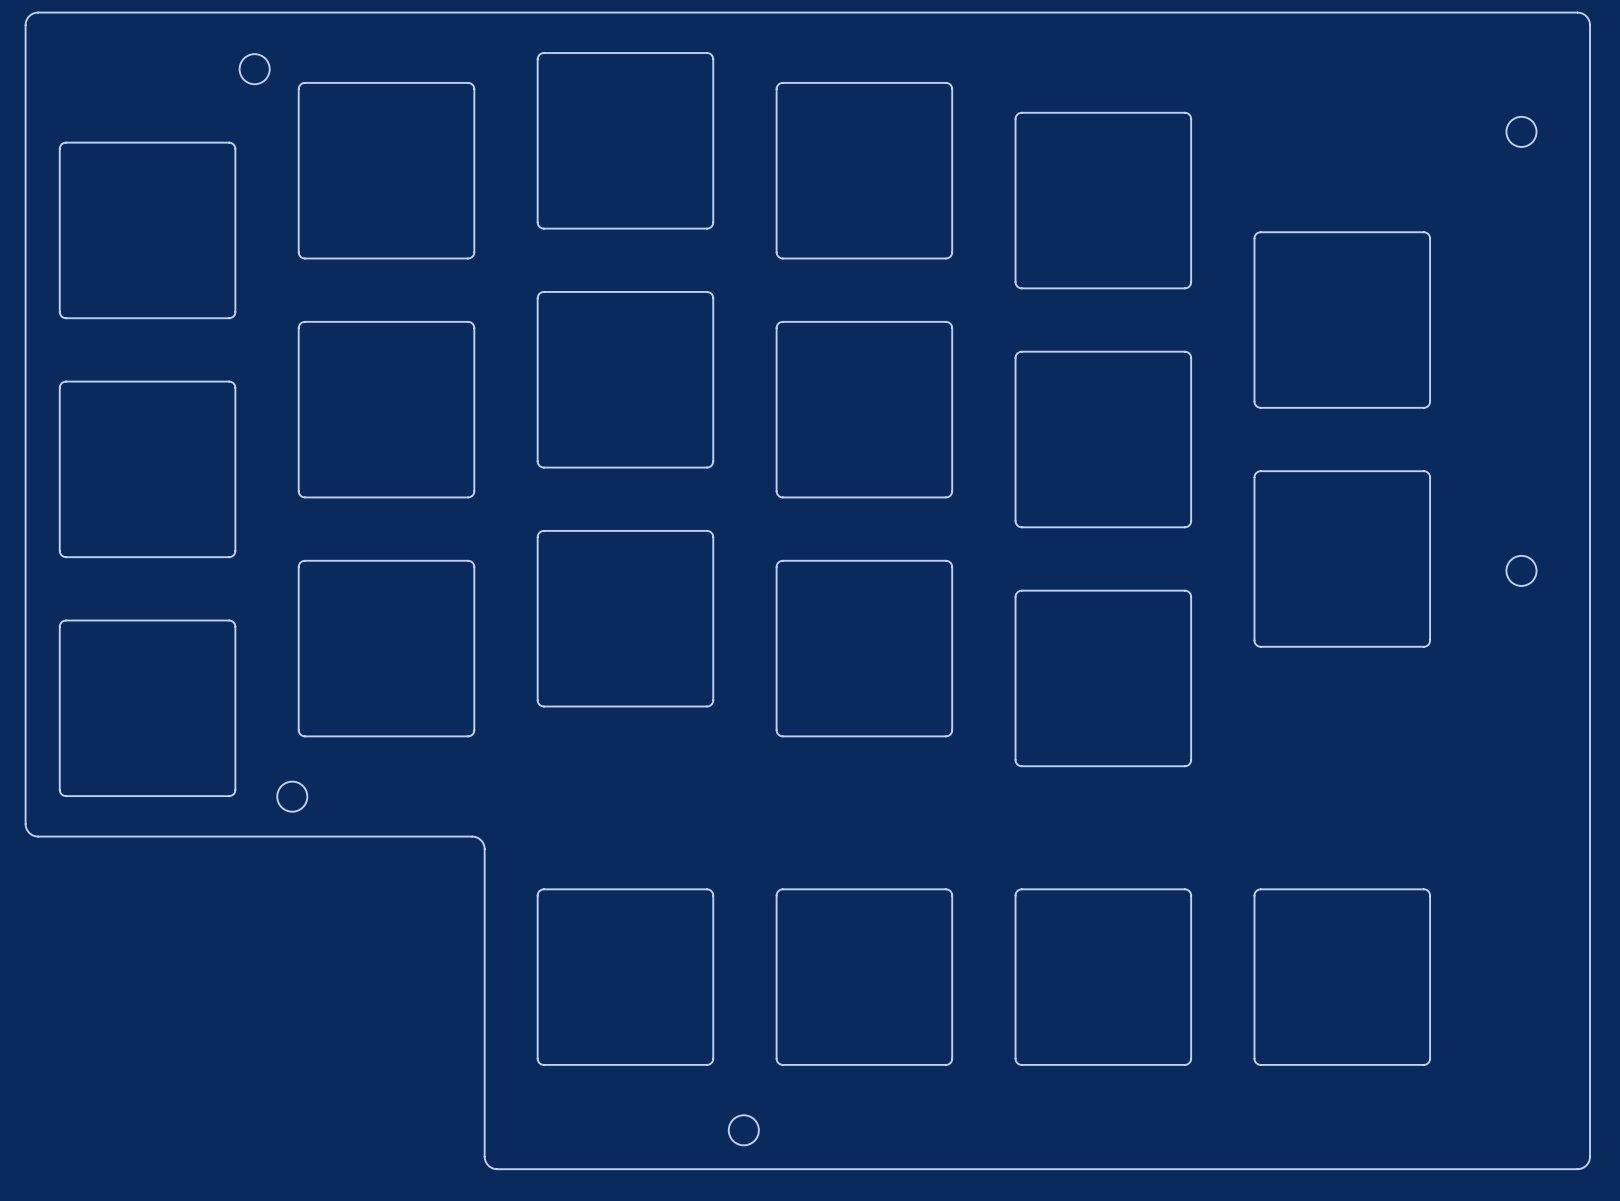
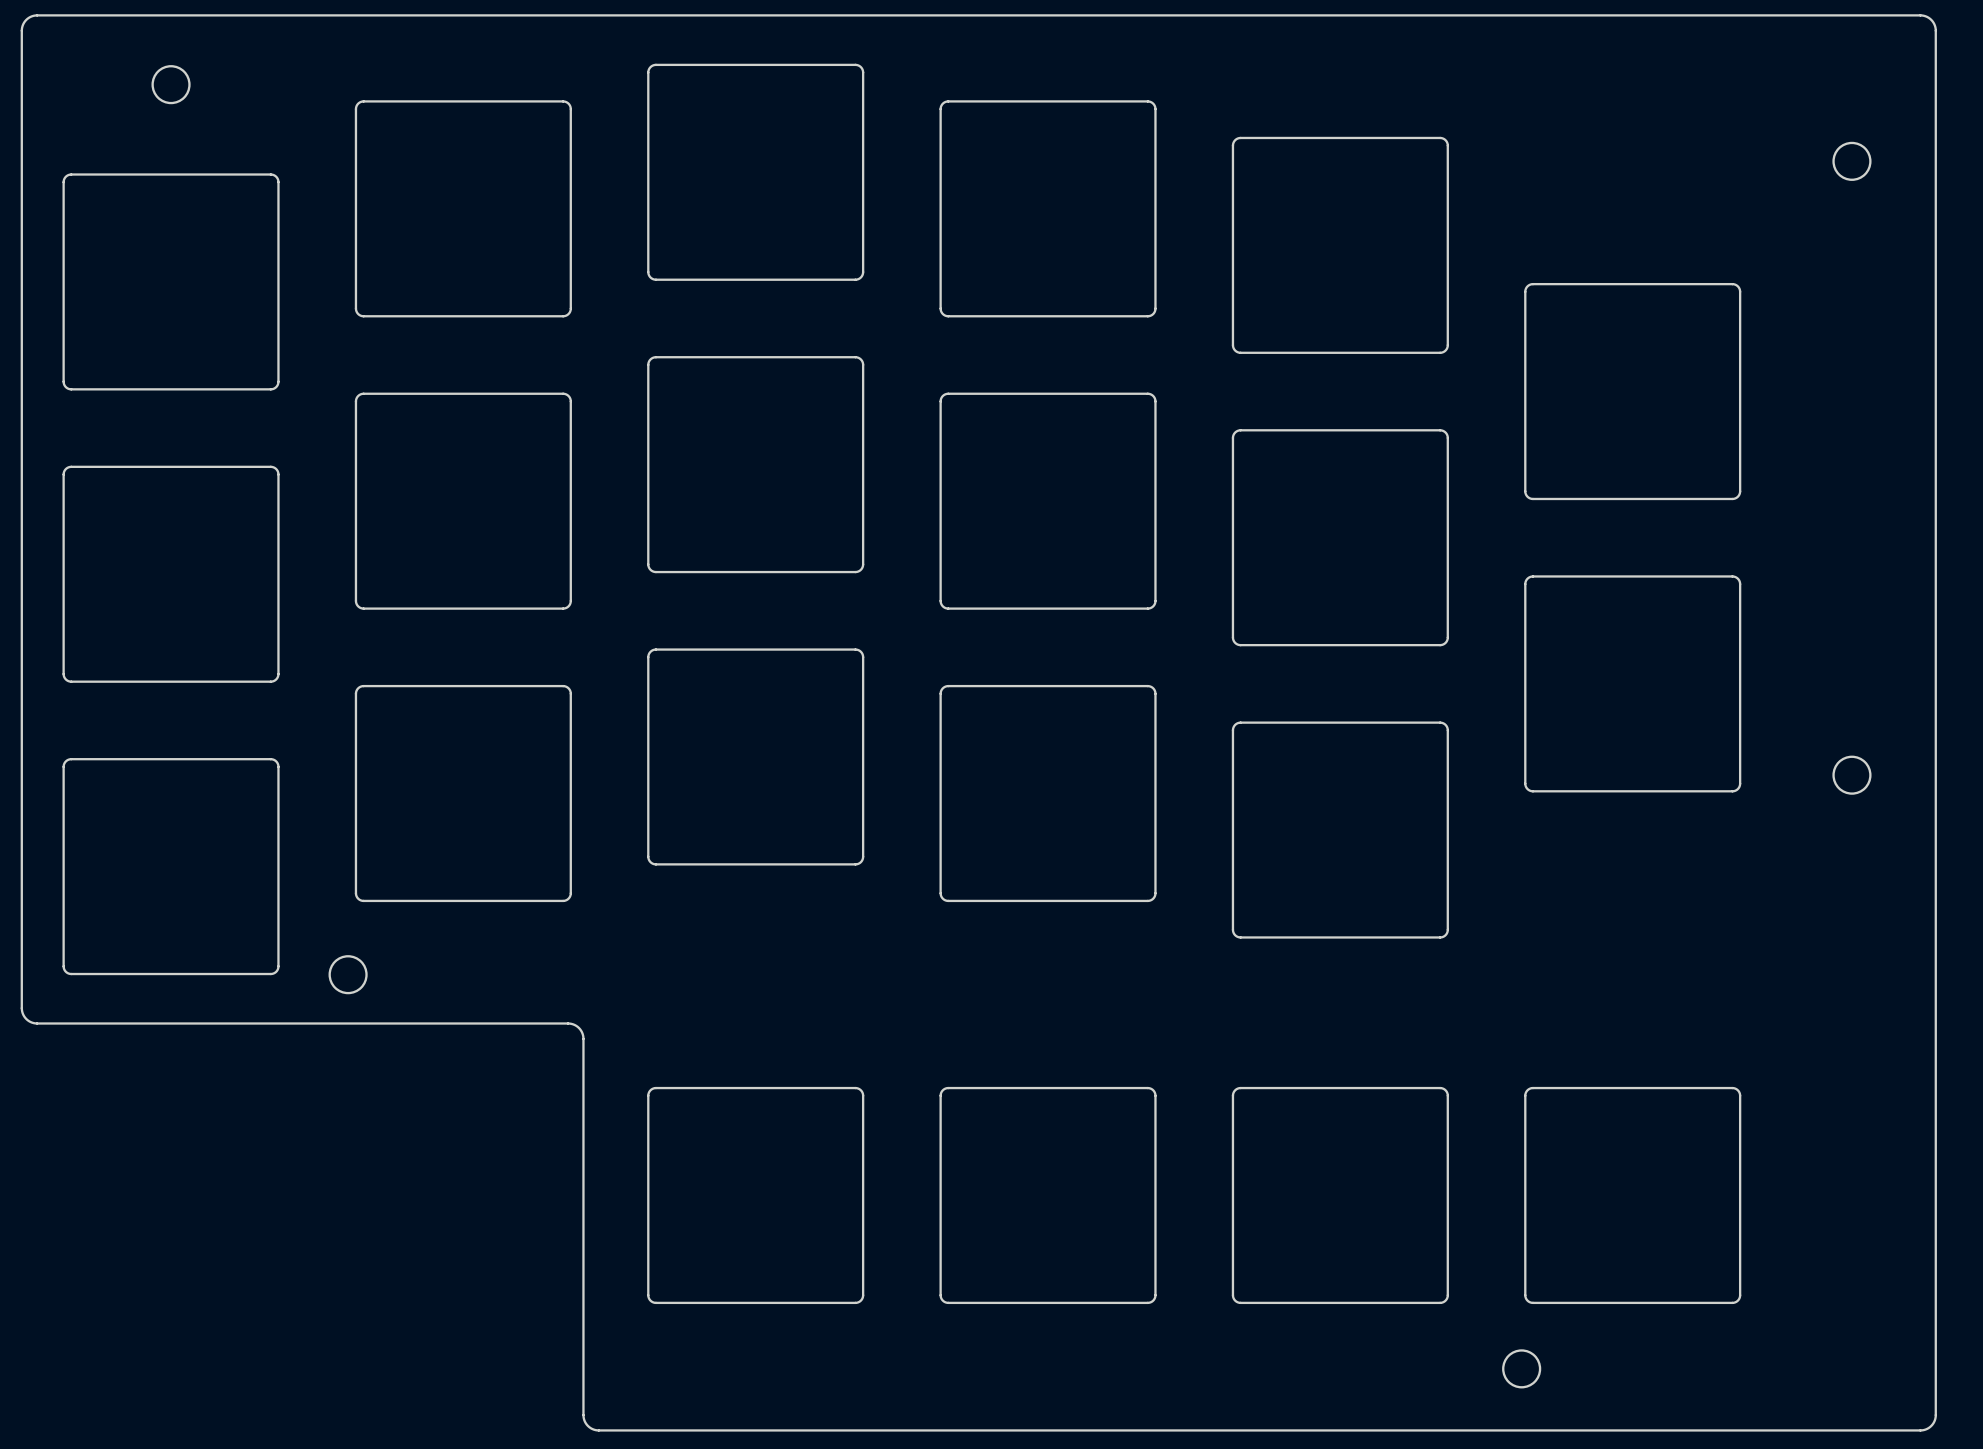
round board edge position: (254, 69) -> (171, 84)
round board edge position: (1521, 570) -> (1851, 775)
round board edge: none -> [1502, 1349, 1542, 1389]
round board edge: [727, 1114, 760, 1147] -> none

